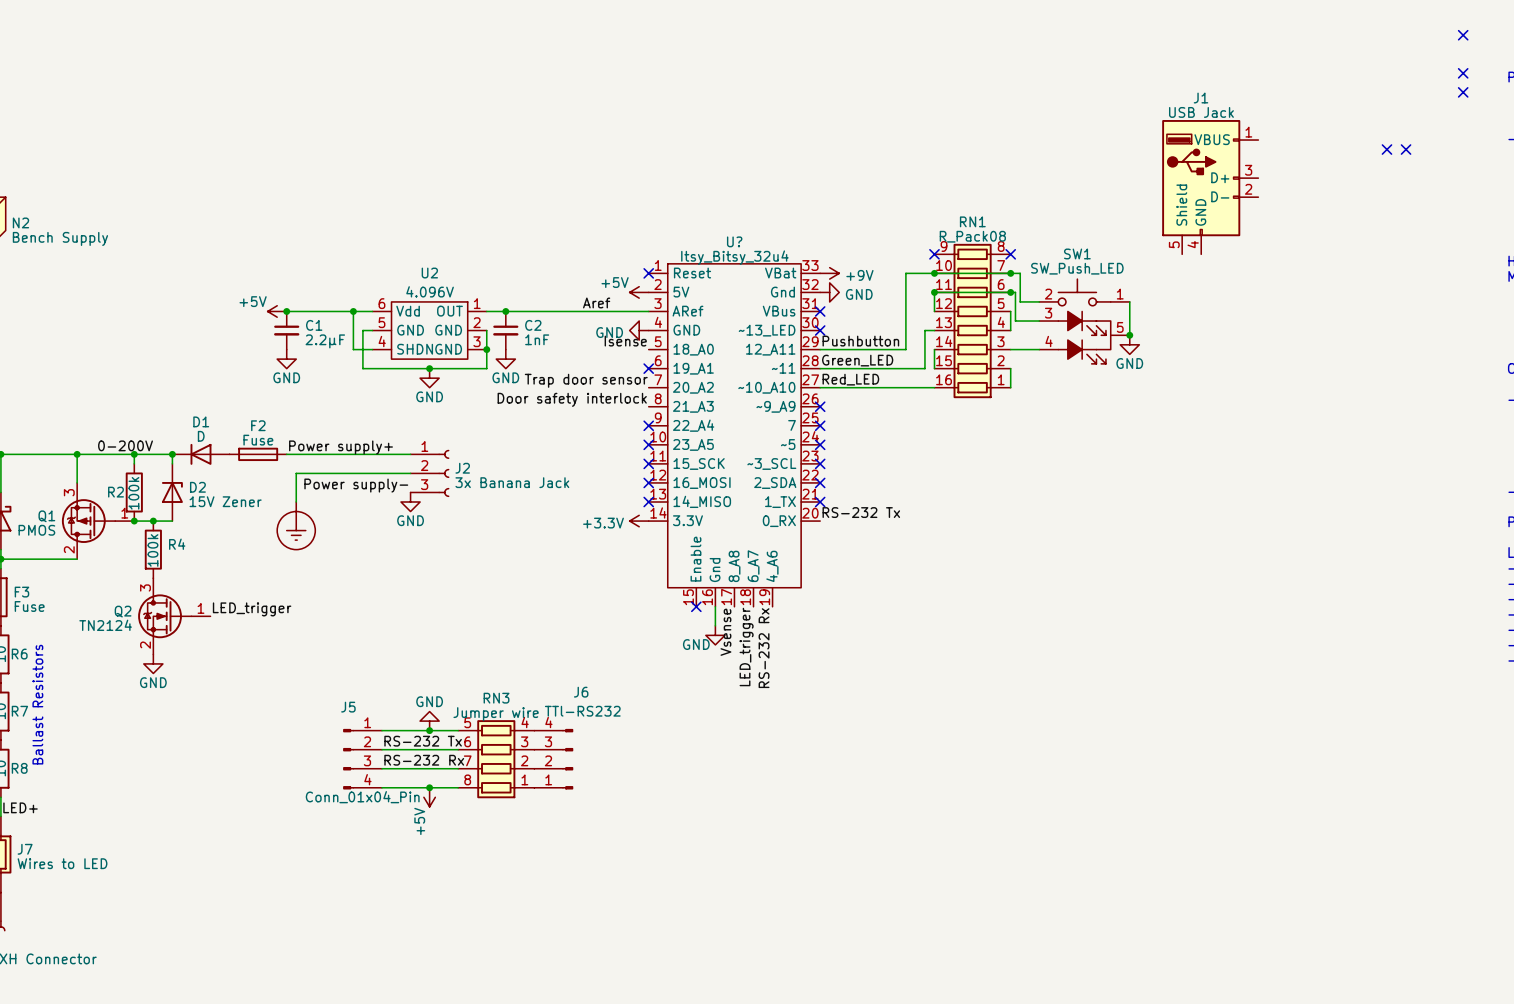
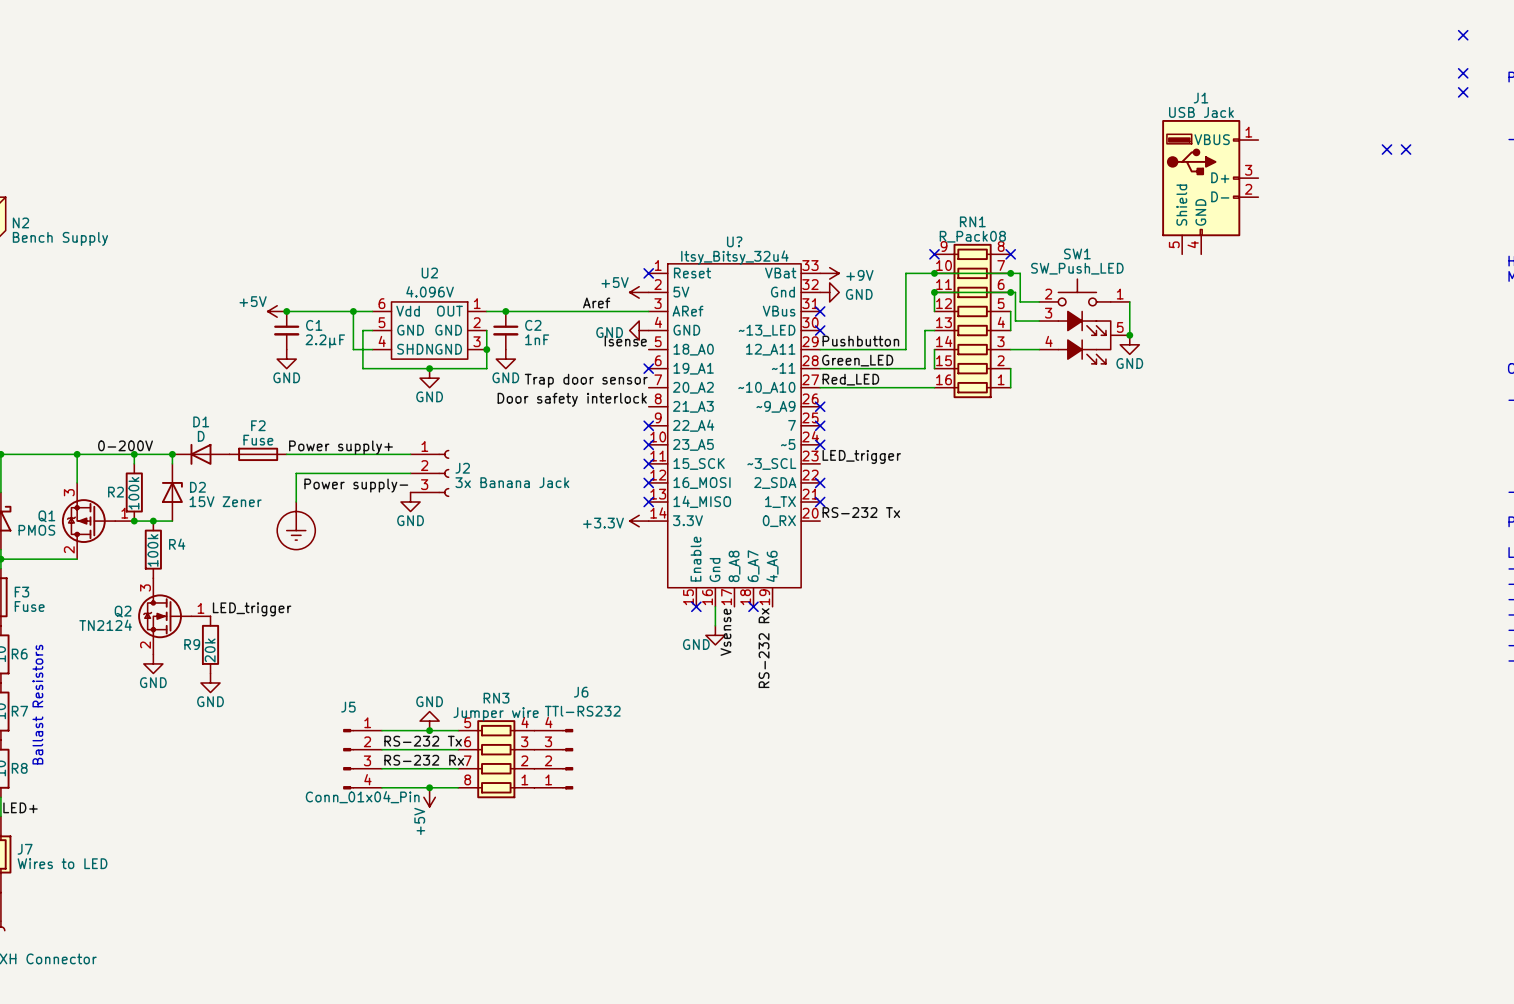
no-connect mark: (820, 463) -> none
no-connect mark: none -> (753, 606)
R9: none -> 20k (210, 644)
label rotation: 0° (746, 647) -> 90° clockwise (861, 456)
label position: LED_trigger (746, 647) -> LED_trigger (861, 456)
power symbol: none -> GND (210, 682)

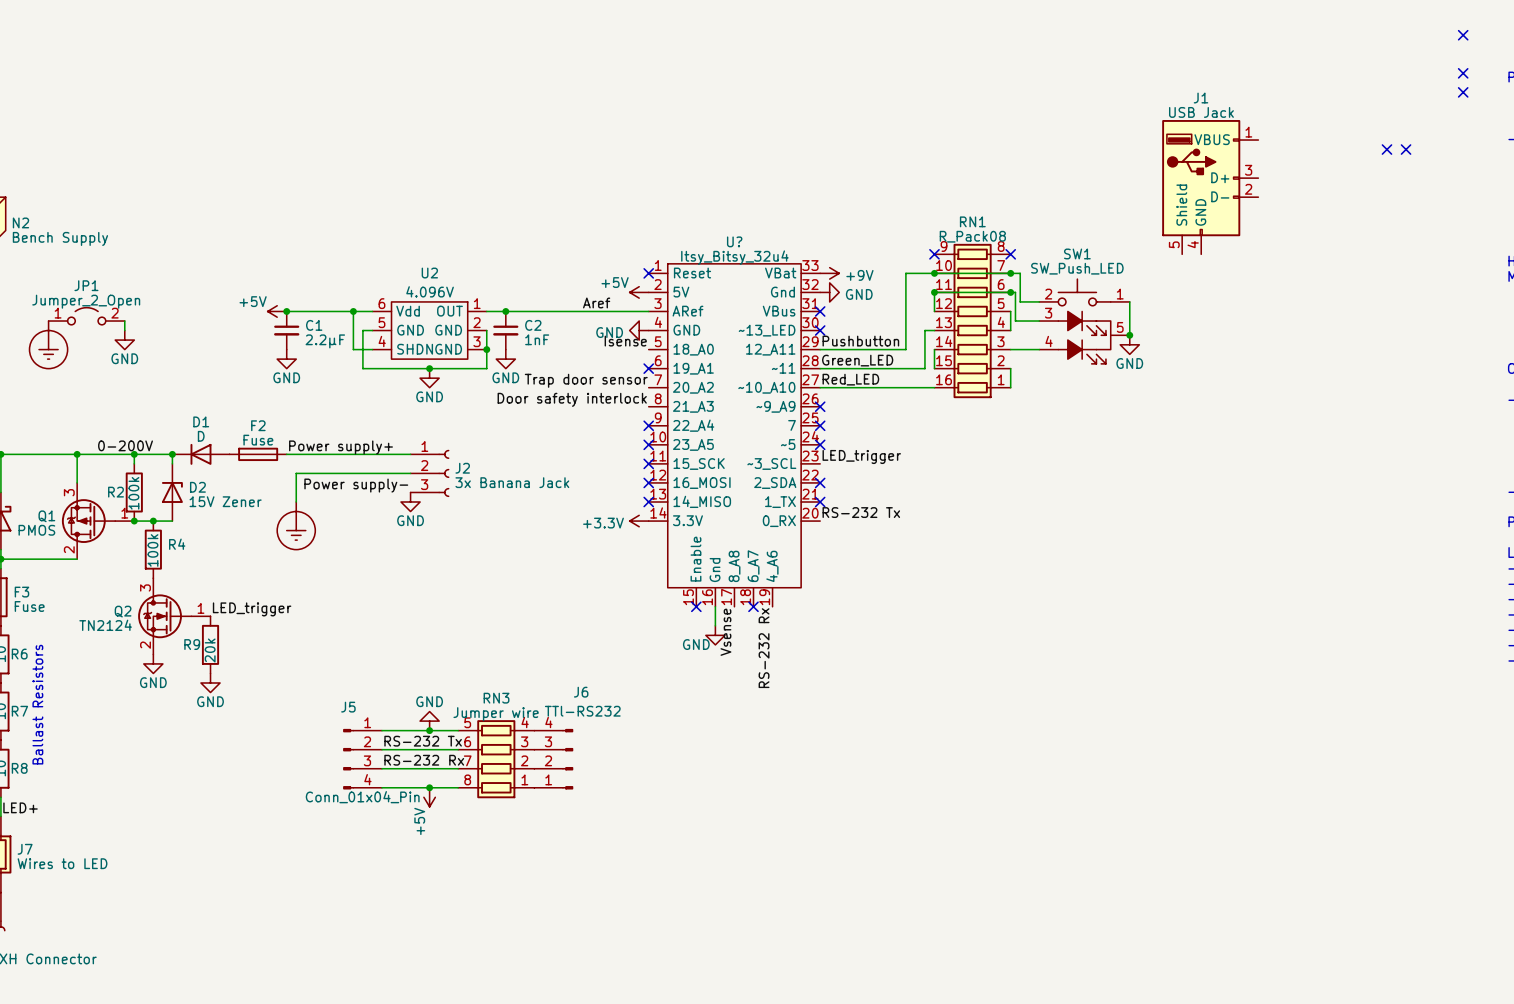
JP1: none -> Jumper_2_Open (86, 316)
wire: none -> (124, 321) (124, 330)
power symbol: none -> GND (124, 340)
power symbol: none -> (48, 344)

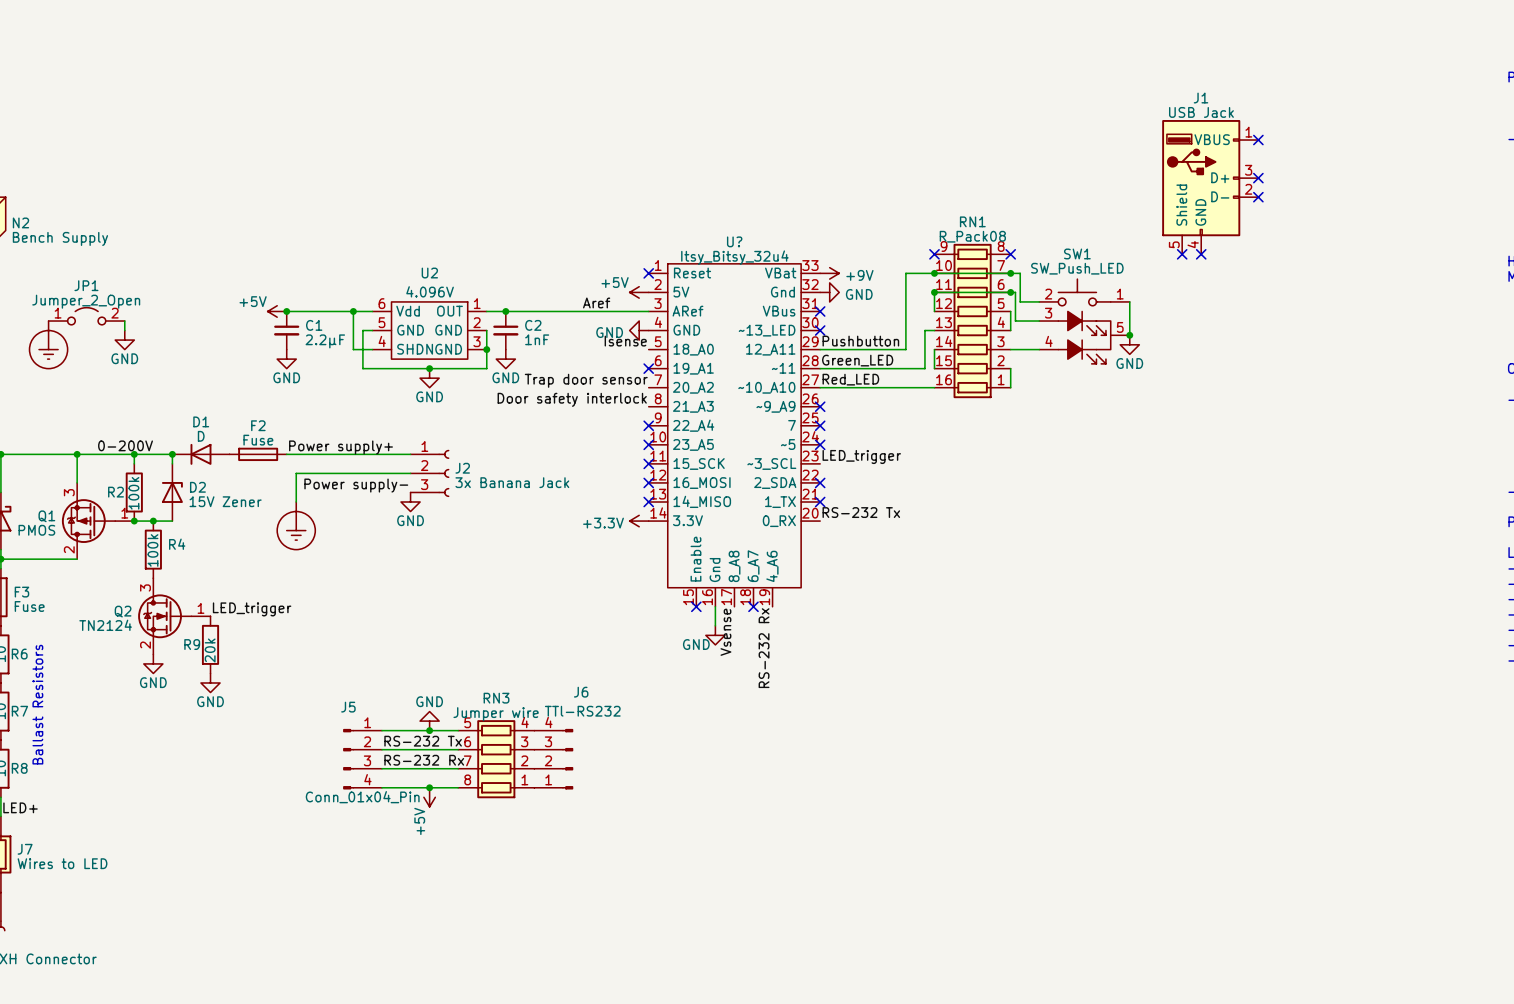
no-connect mark: (1463, 35) -> none
no-connect mark: (1463, 73) -> none
no-connect mark: (1463, 92) -> none
no-connect mark: none -> (1258, 140)
no-connect mark: (1386, 149) -> none
no-connect mark: (1406, 149) -> none
no-connect mark: none -> (1258, 178)
no-connect mark: none -> (1258, 197)
no-connect mark: none -> (1182, 254)
no-connect mark: none -> (1201, 254)

